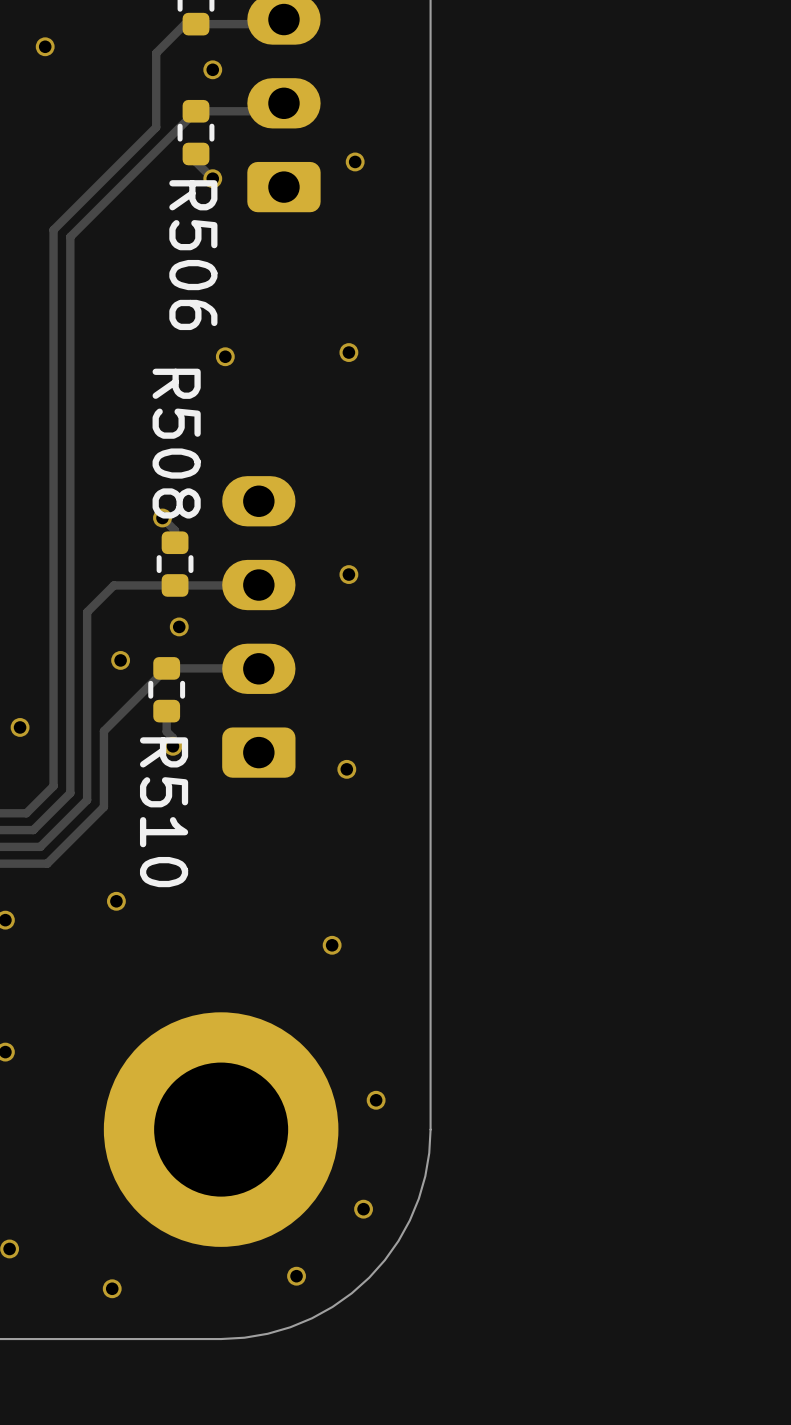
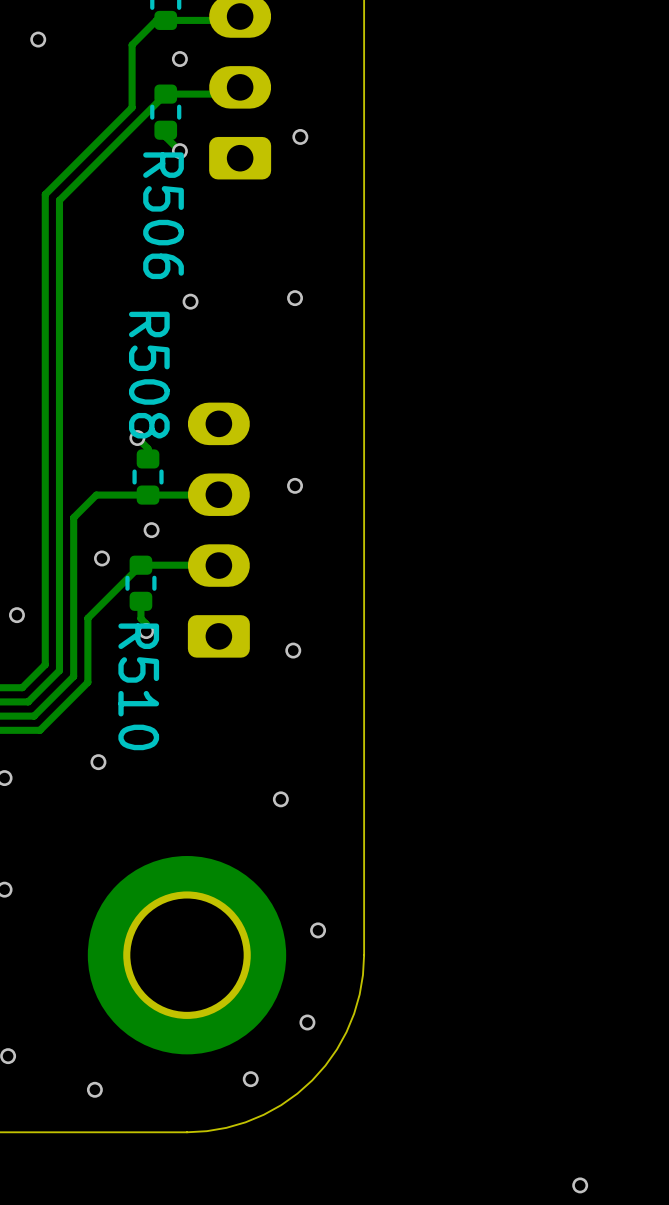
via: none -> (580, 1185)

